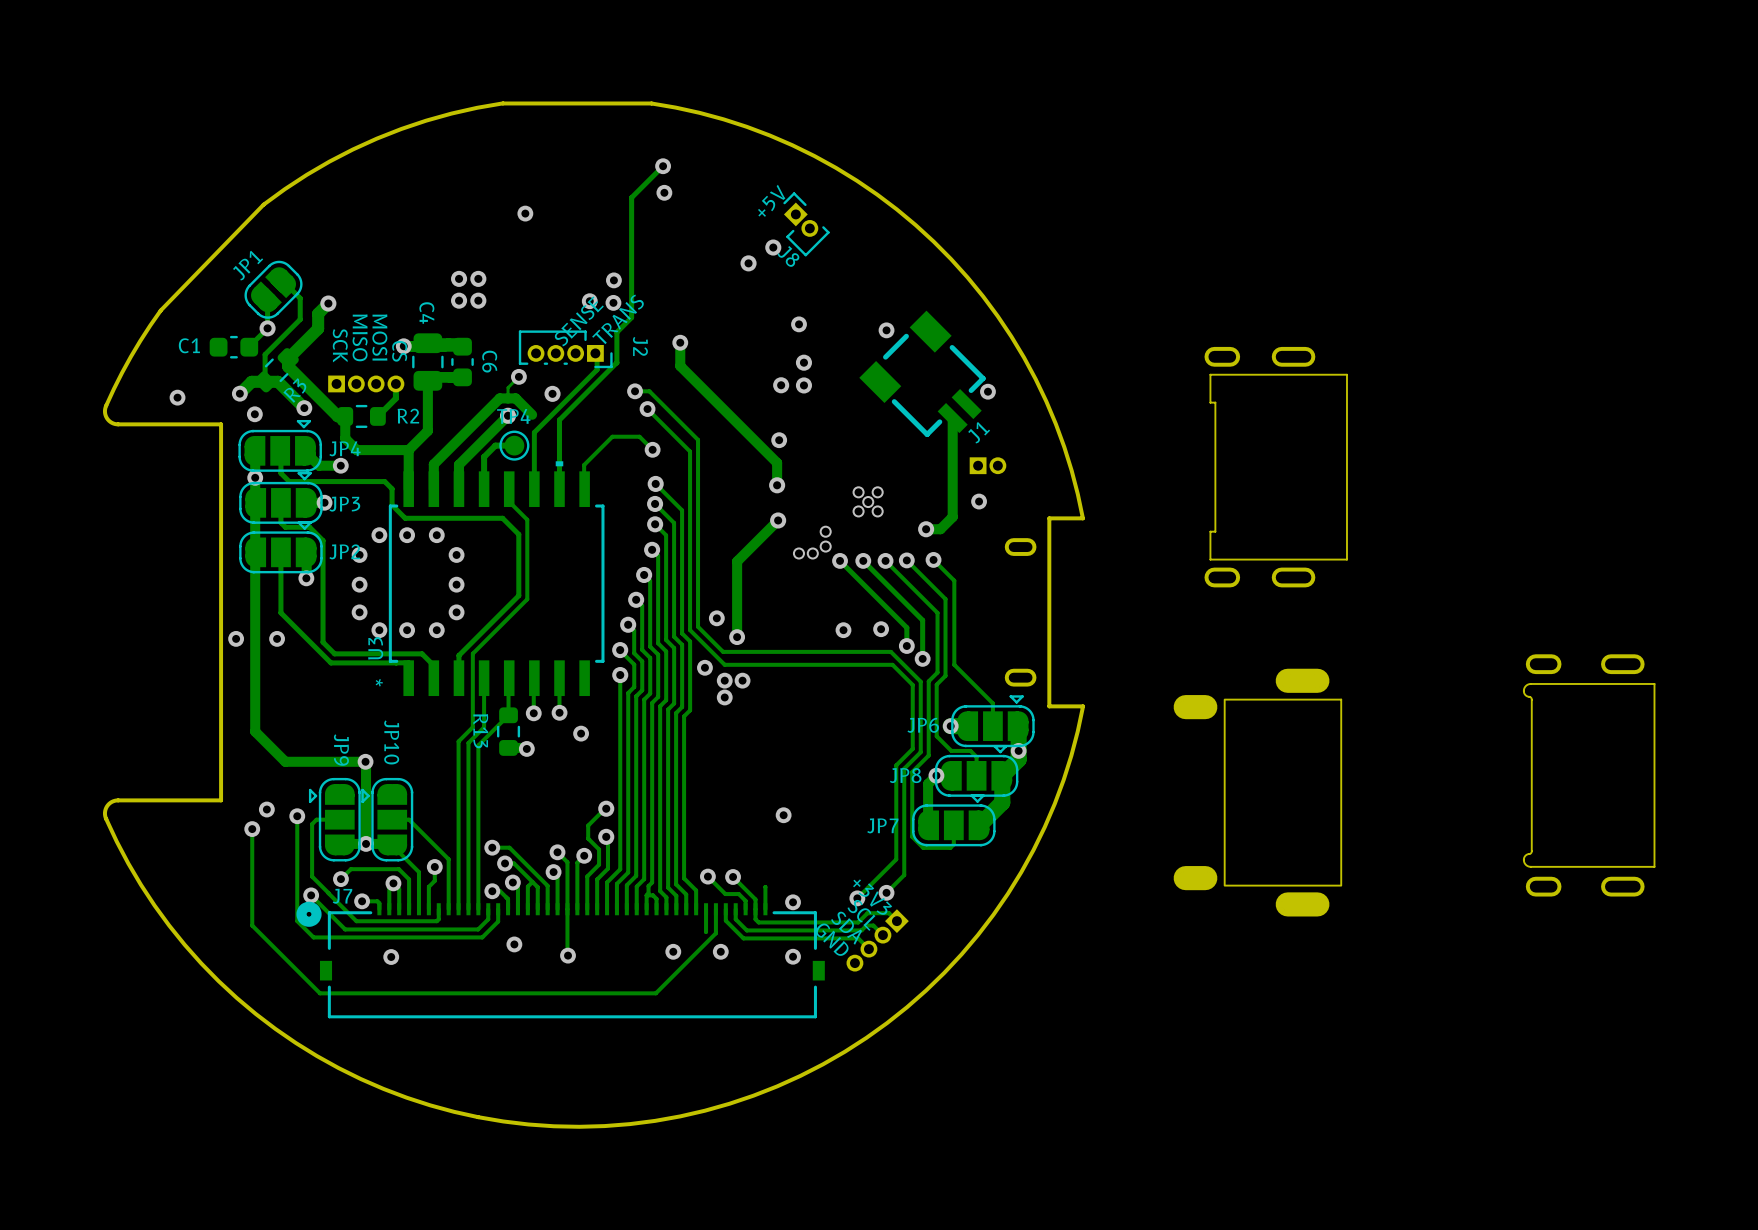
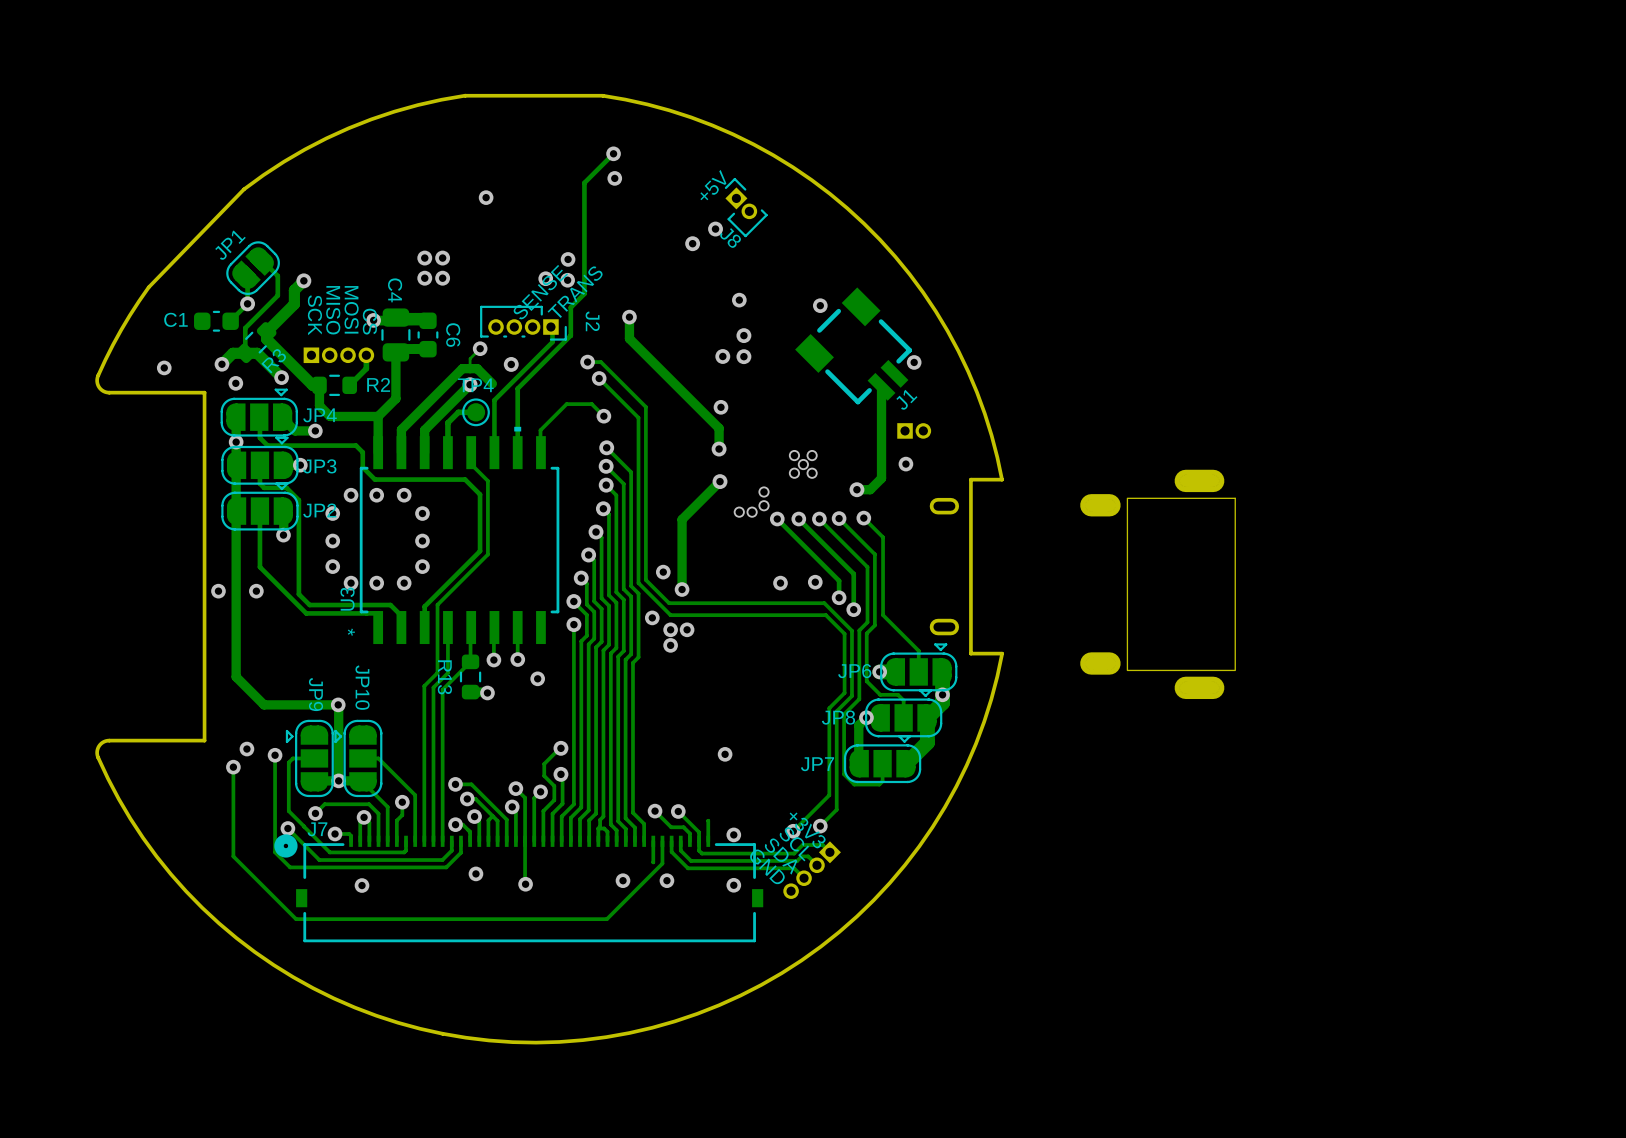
part: (1275, 467) -> none
part: (1589, 775) -> none
part position: (1257, 792) -> (1157, 584)

